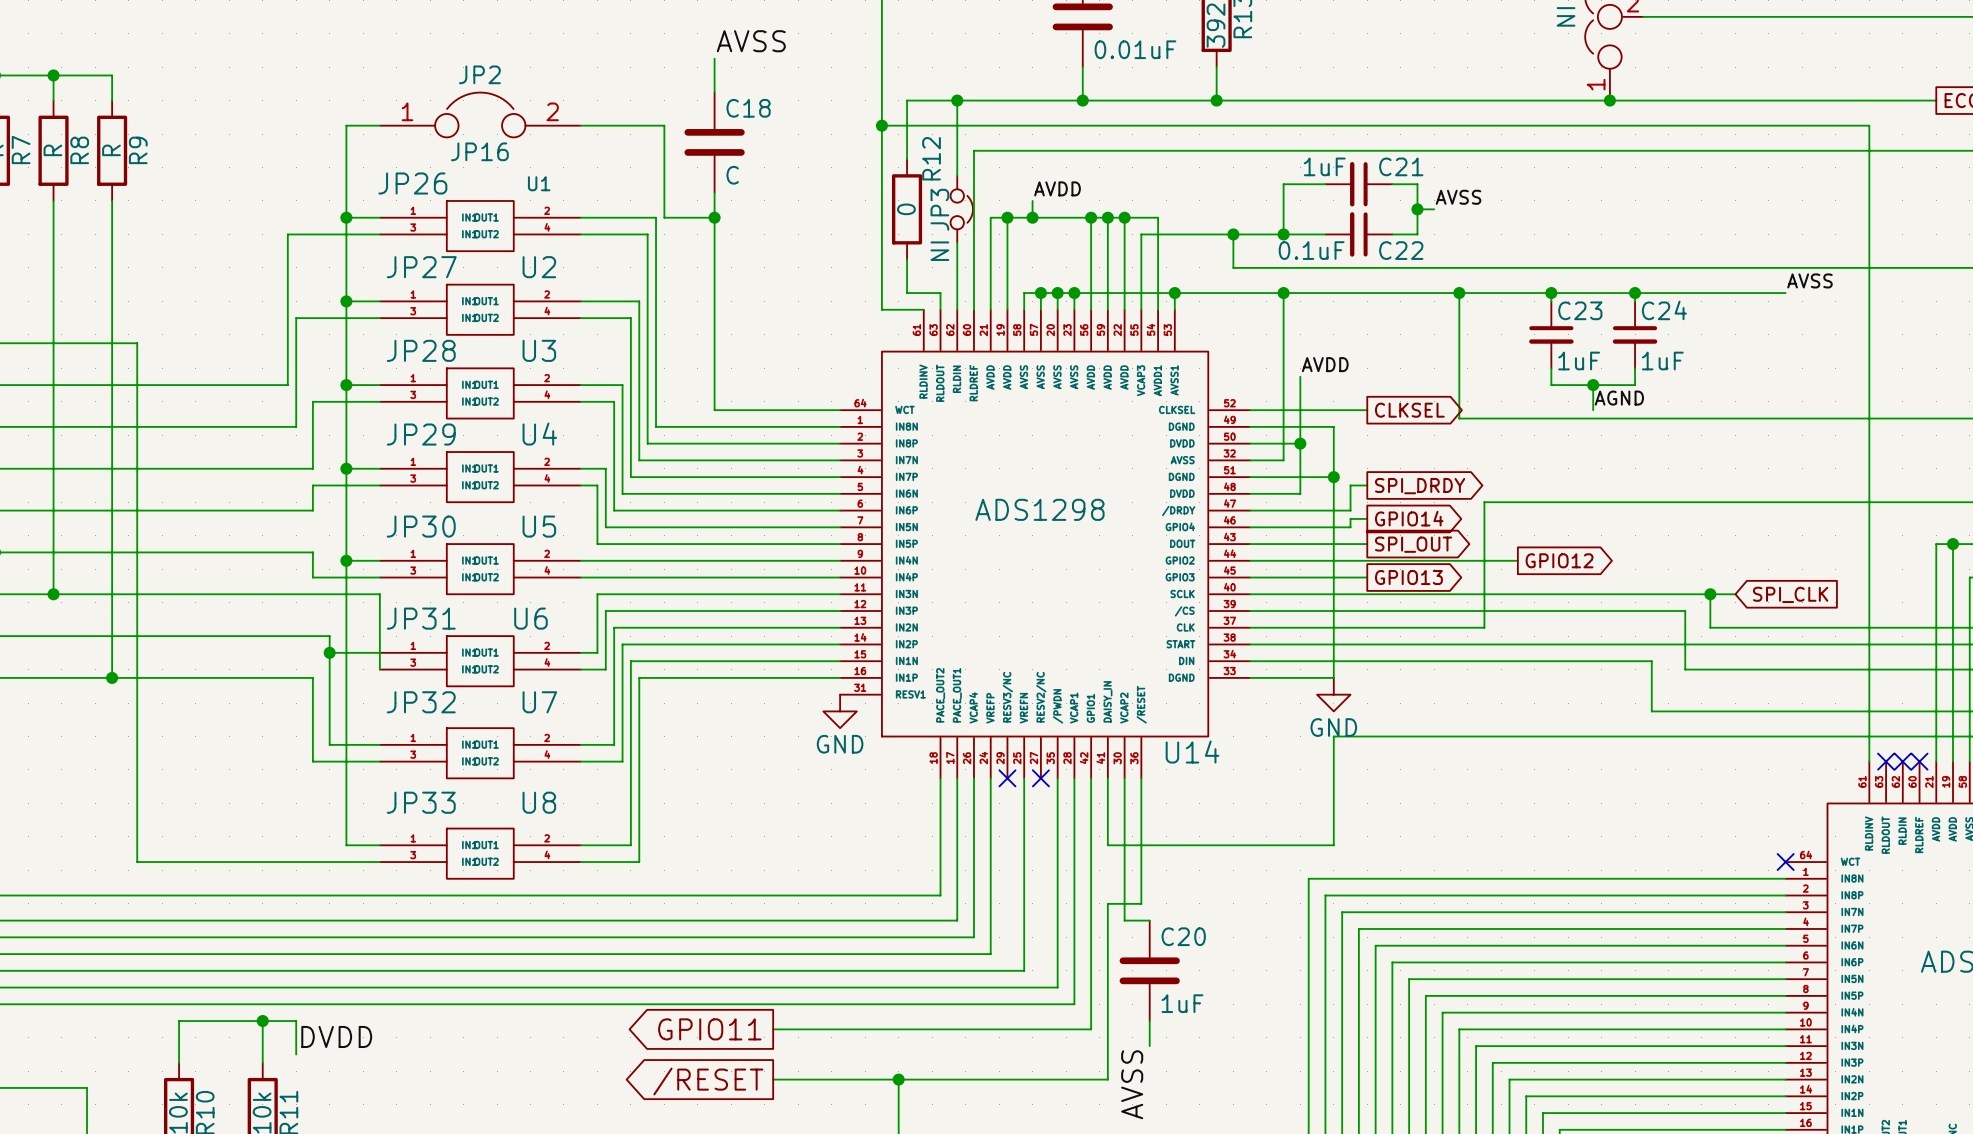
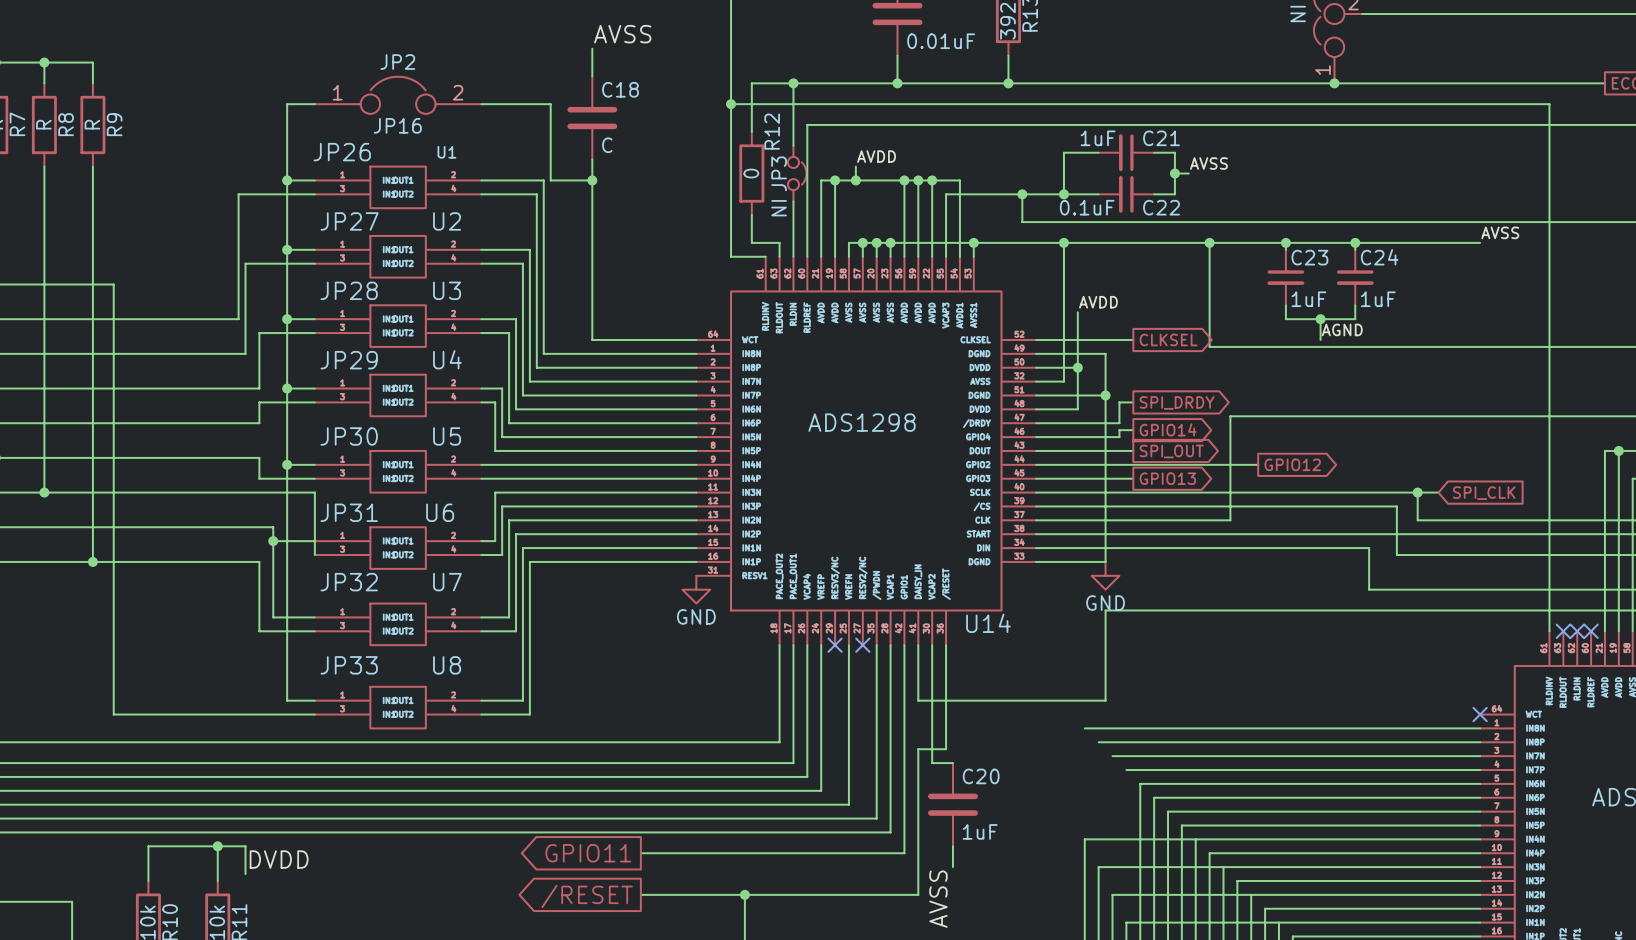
wire: (1308, 878) (1308, 1012) -> (1195, 839) (1084, 839)
wire: (1325, 895) (1325, 1046) -> (1223, 867) (1098, 867)
wire: (1342, 912) (1342, 1079) -> (1251, 894) (1112, 894)
wire: (1358, 928) (1358, 1113) -> (1278, 922) (1126, 922)

